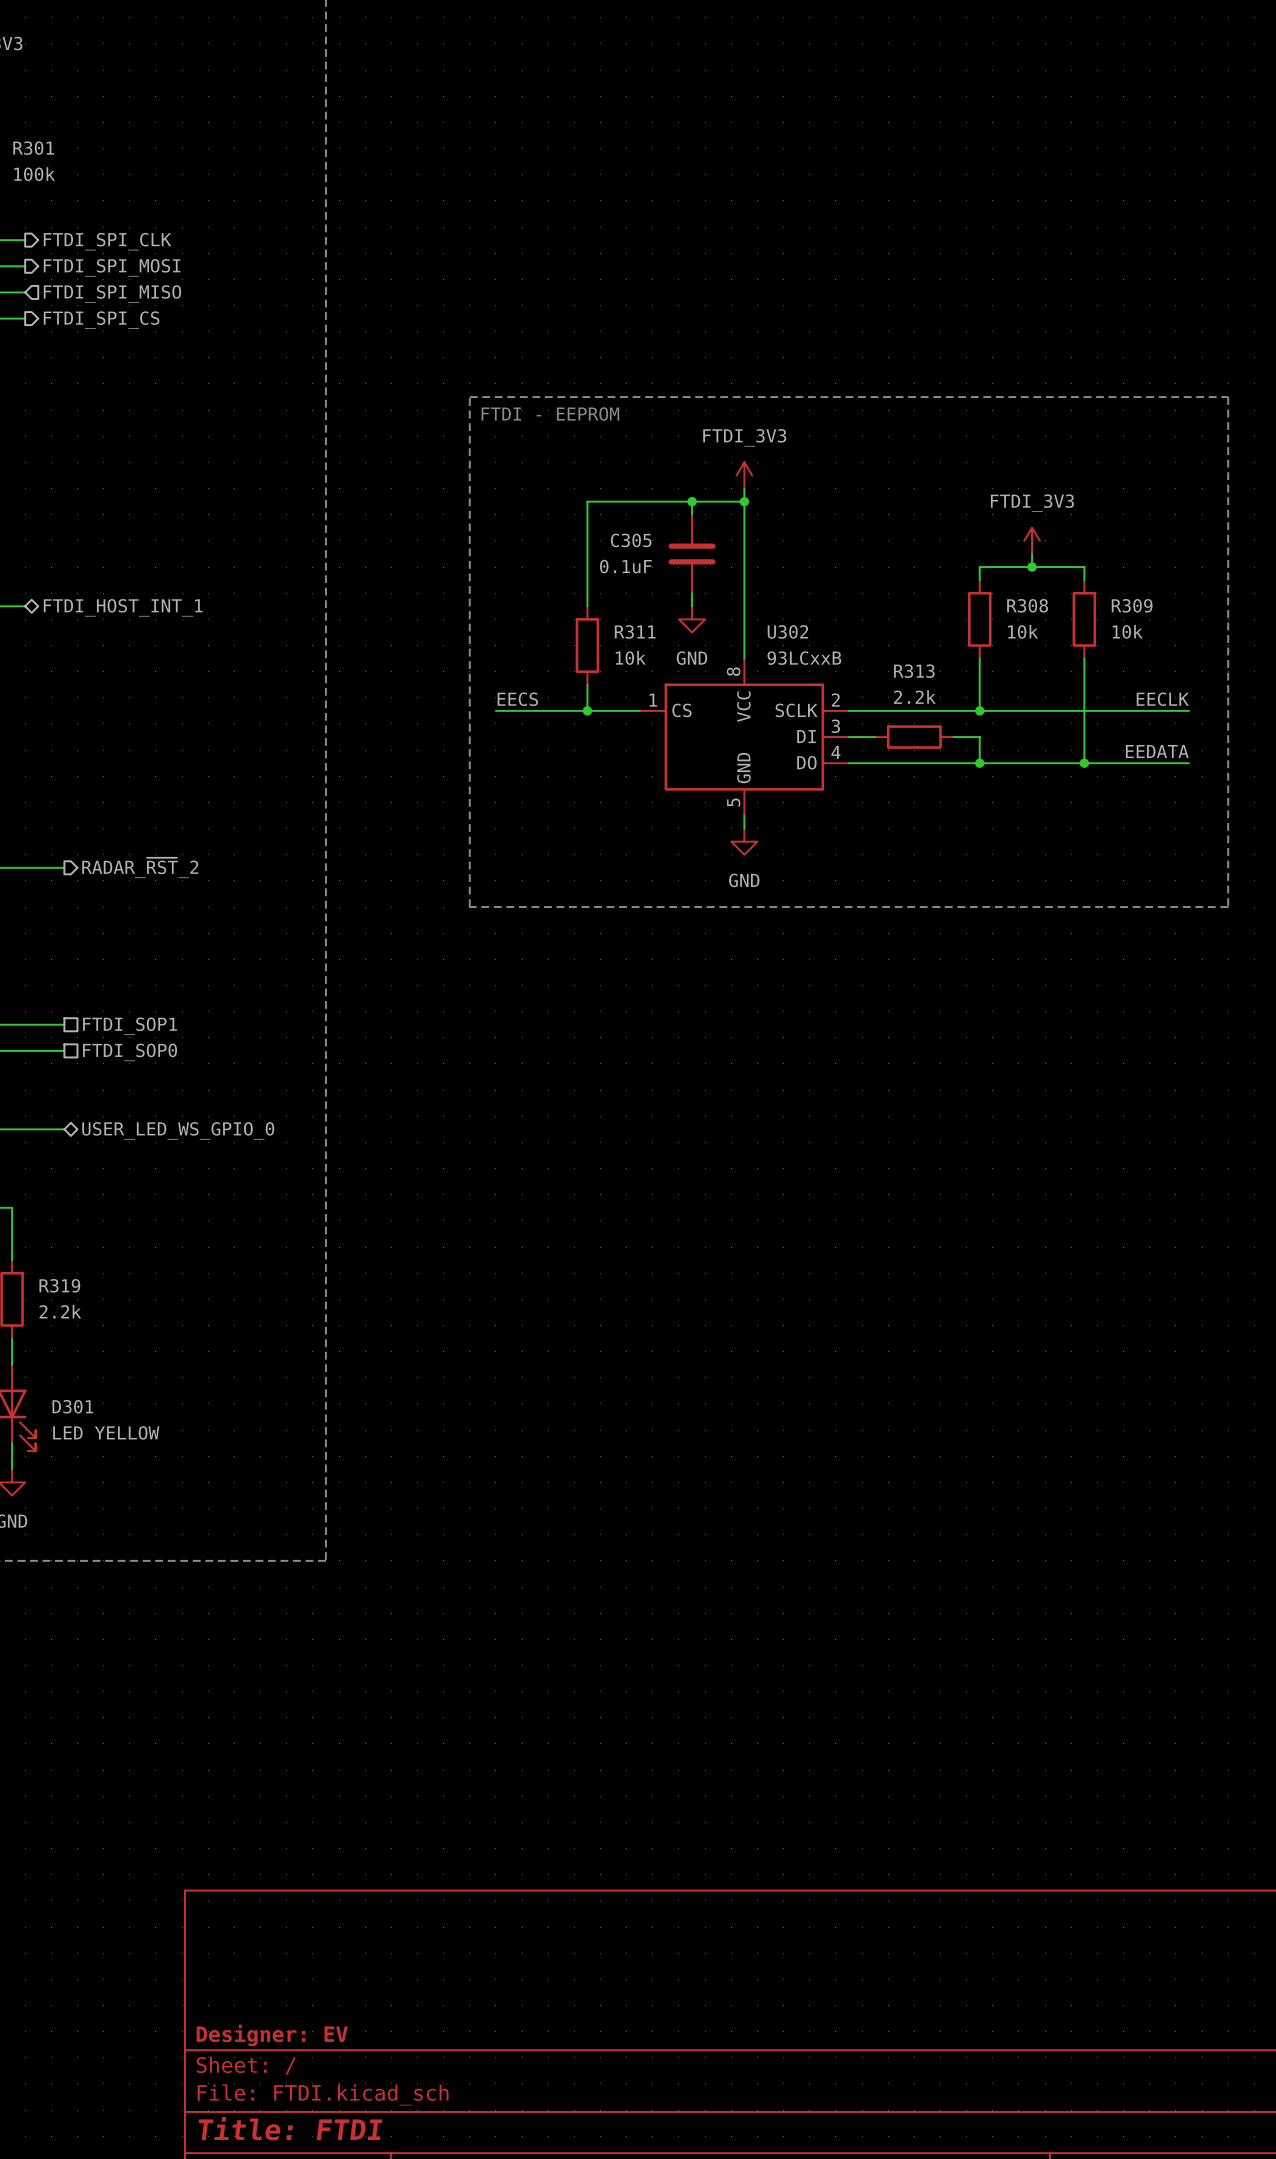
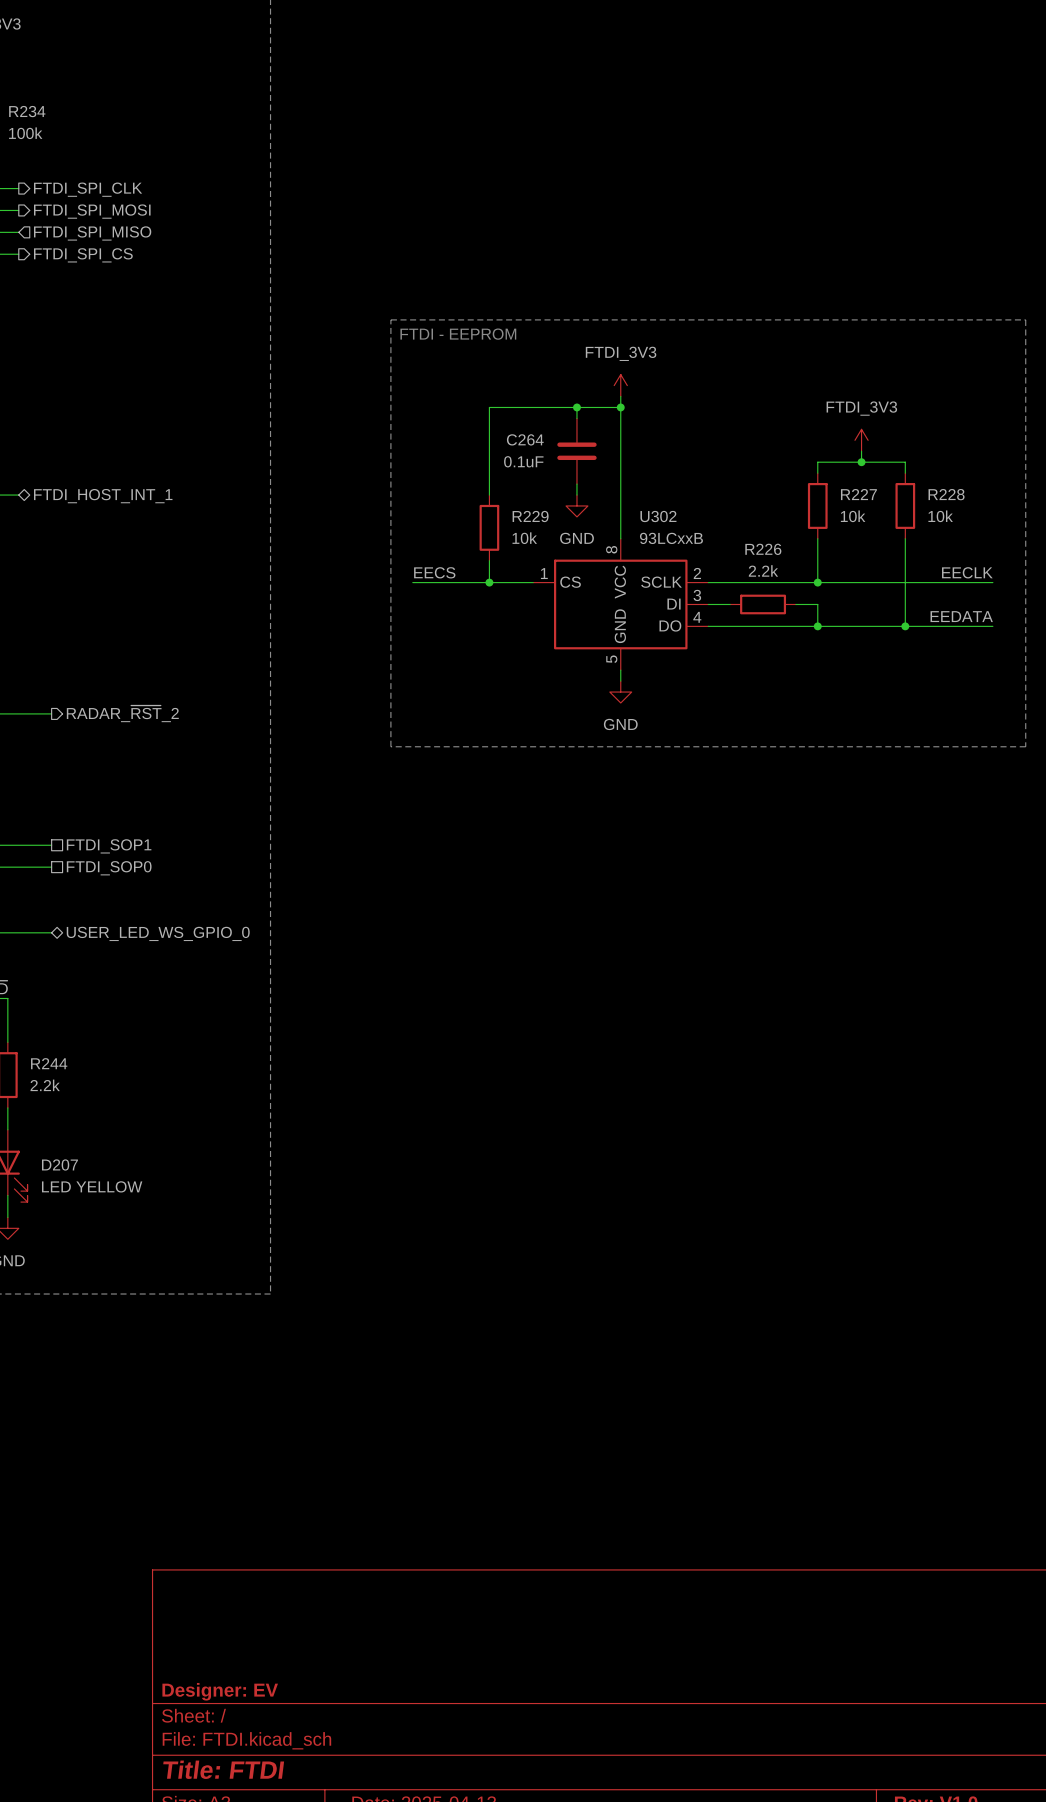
R301 name: R301 (33, 148) -> R234 (27, 111)
C305 name: C305 (631, 540) -> C264 (525, 439)
R308 name: R308 (1027, 605) -> R227 (858, 494)
R309 name: R309 (1132, 605) -> R228 (946, 494)
R311 name: R311 (635, 631) -> R229 (530, 516)
R313 name: R313 (914, 671) -> R226 (763, 549)
R319 name: R319 (59, 1285) -> R244 (49, 1063)
D301 name: D301 (72, 1406) -> D207 (59, 1164)

